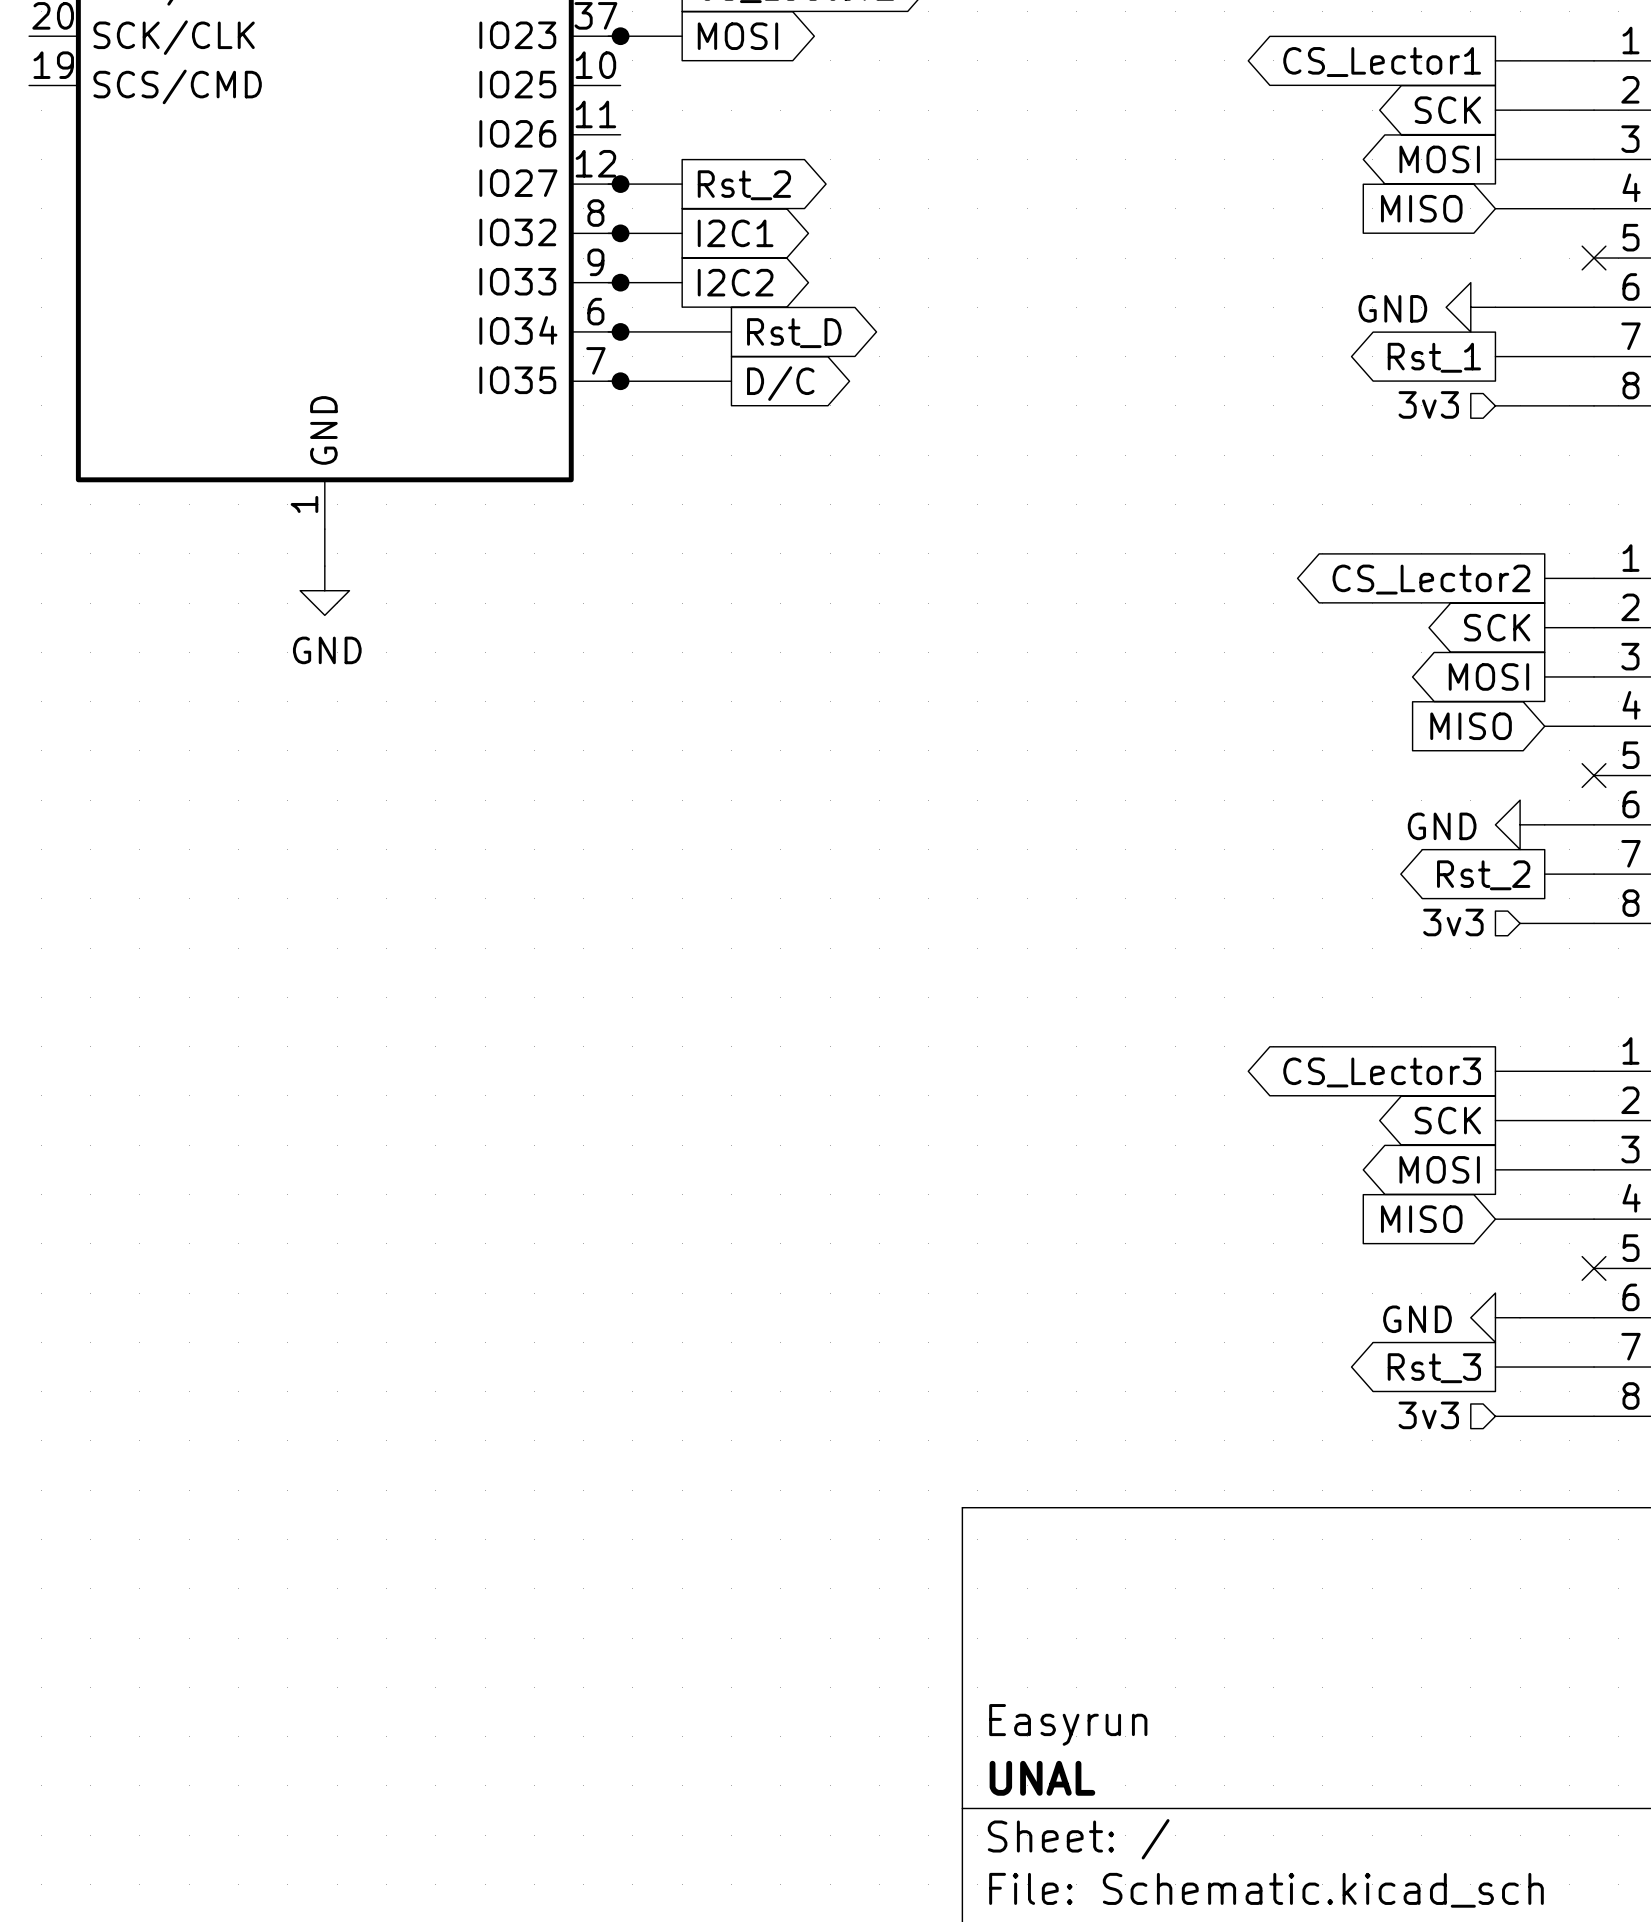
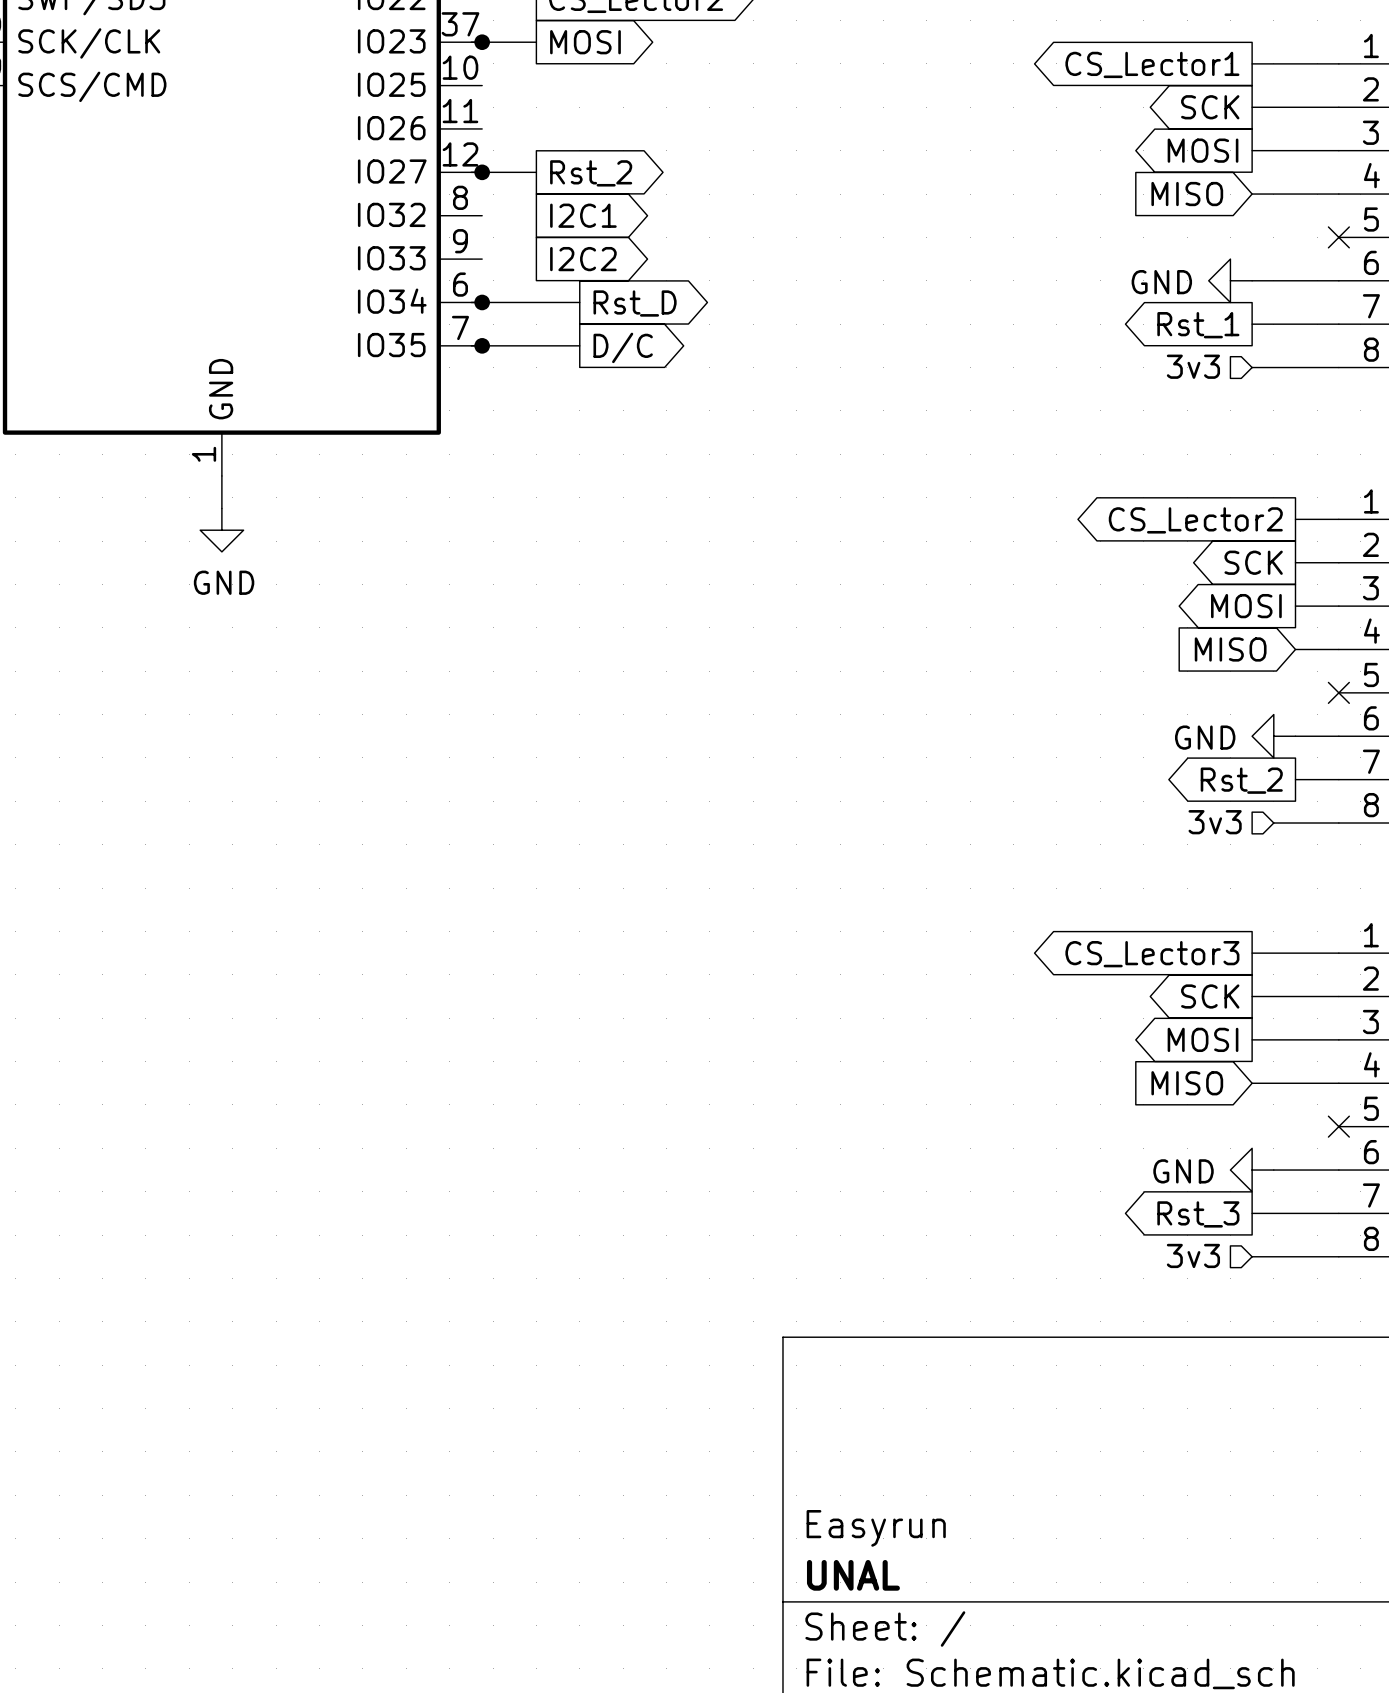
wire: (608, 233) (682, 233) -> none
junction: (620, 233) -> none
wire: (608, 282) (682, 282) -> none
junction: (620, 282) -> none

